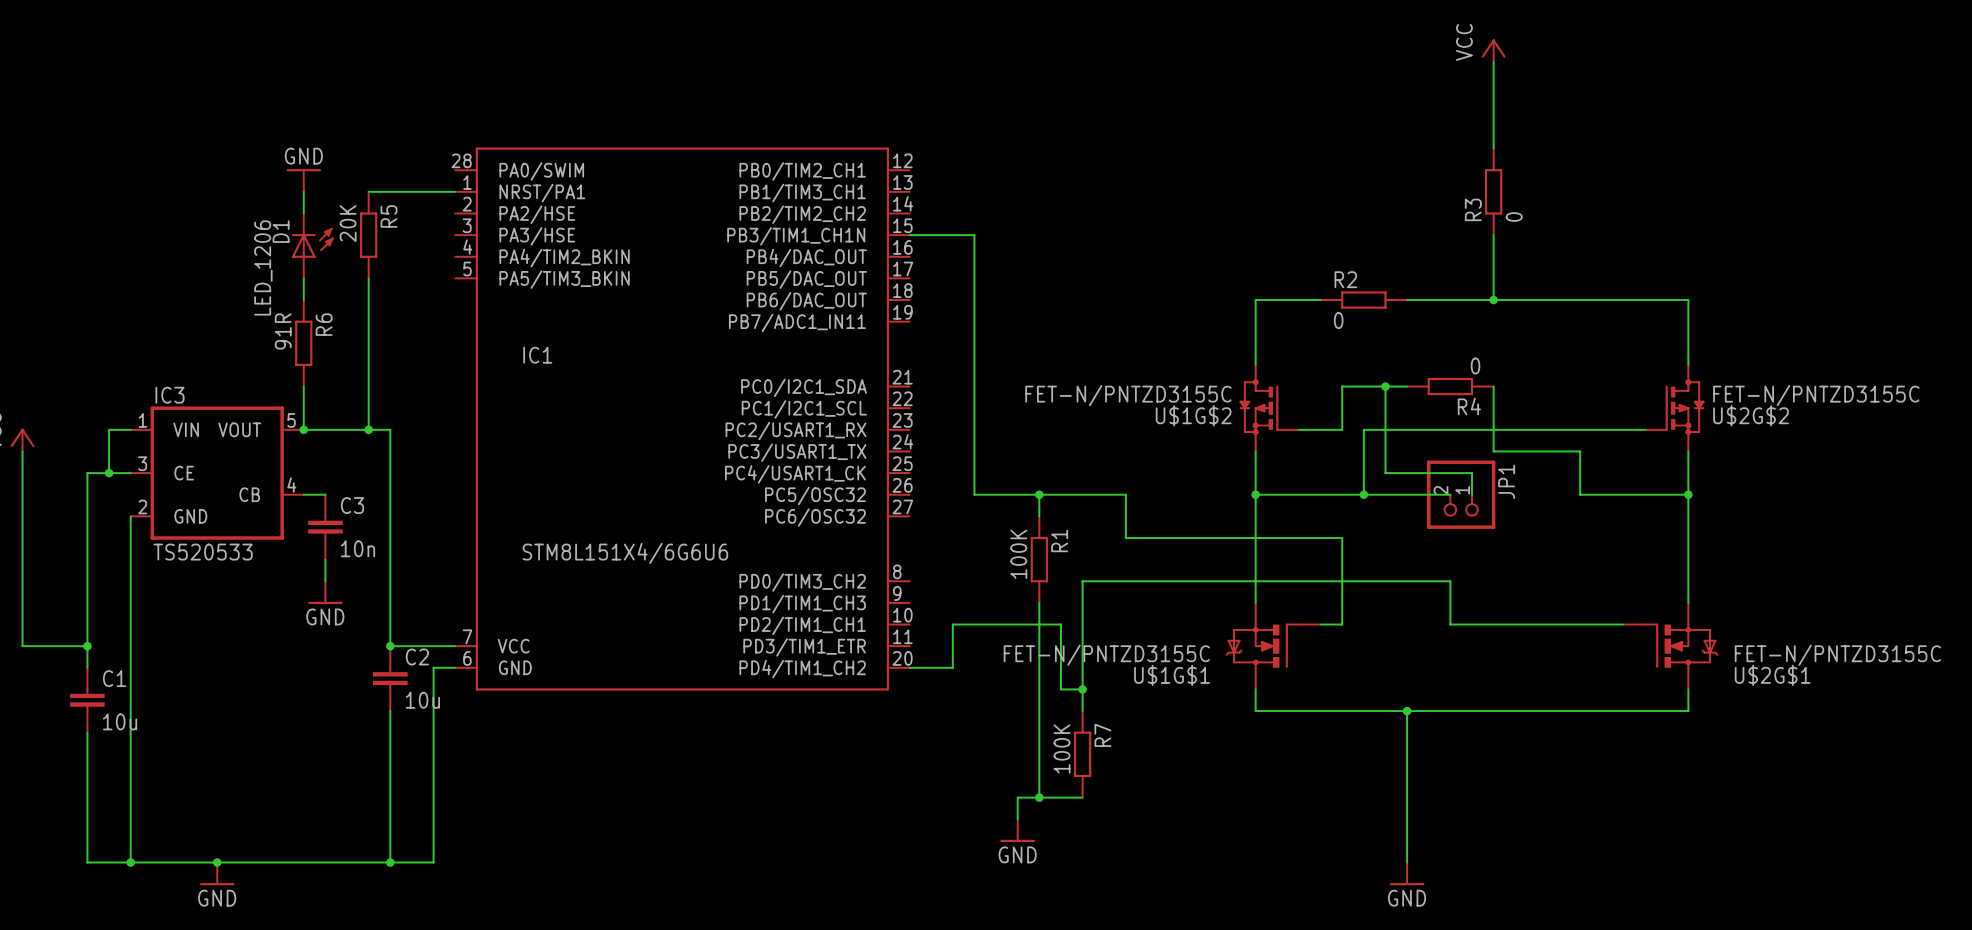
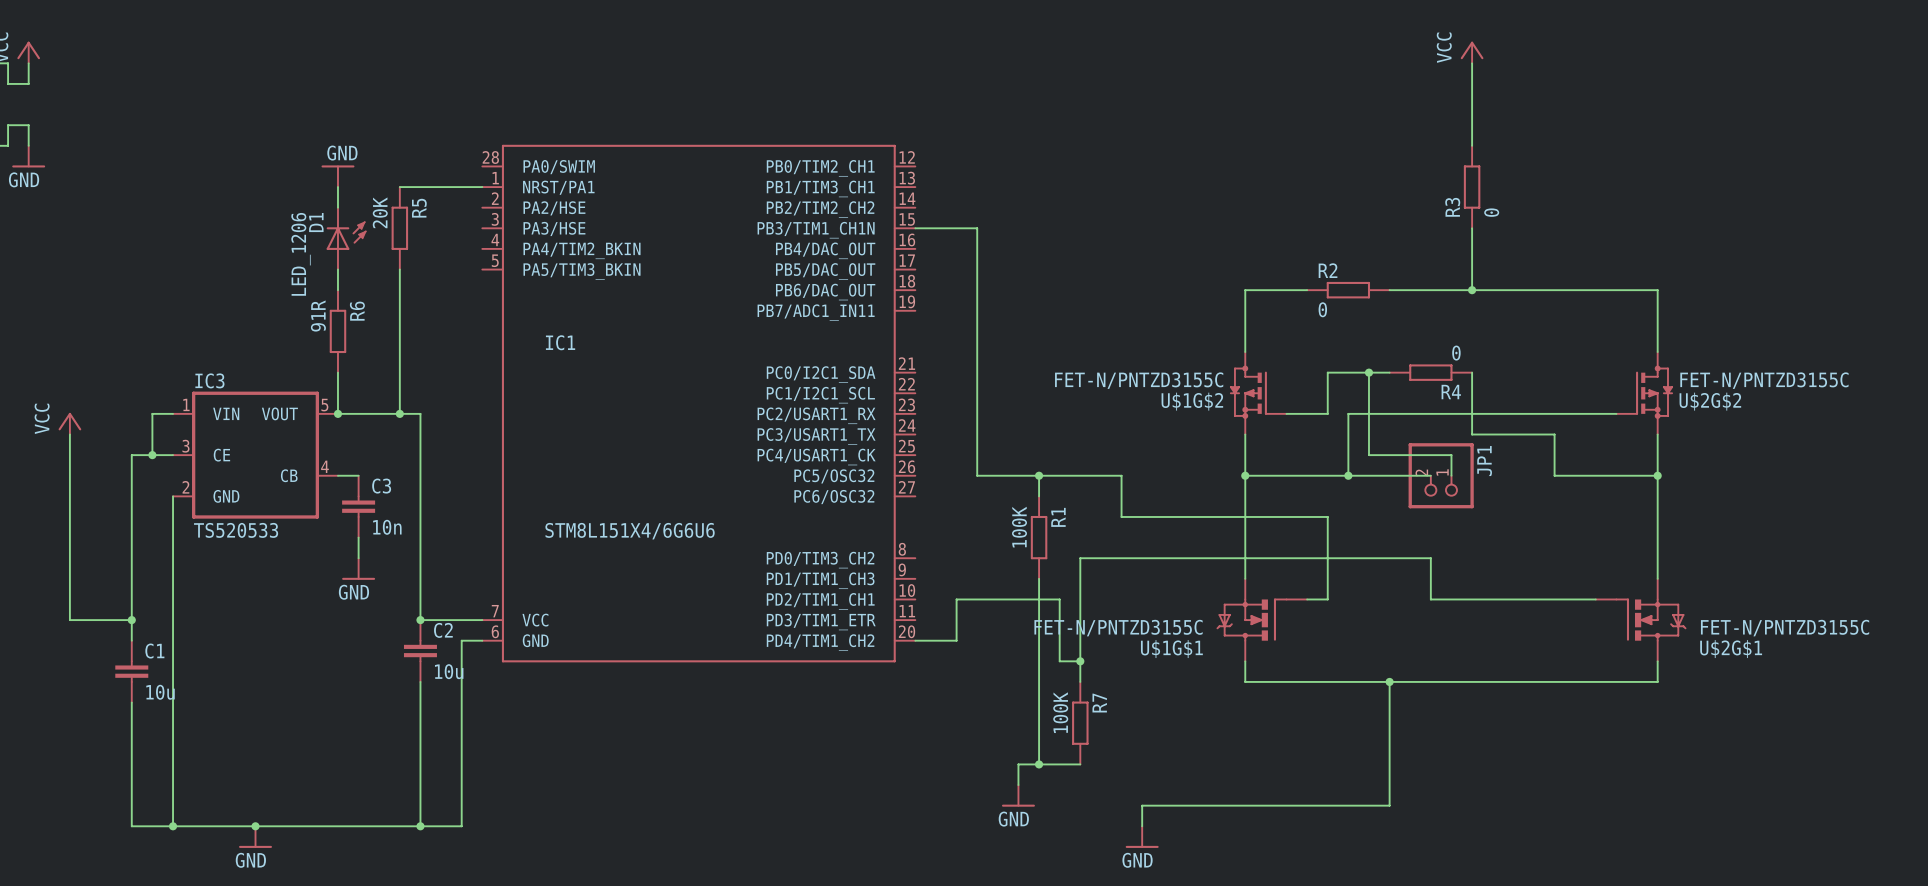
wire: (1407, 840) (1407, 862) -> (1389, 805) (1142, 805) (1142, 826)
power symbol: none -> GND (1142, 837)
power symbol: GND (1407, 873) -> none

